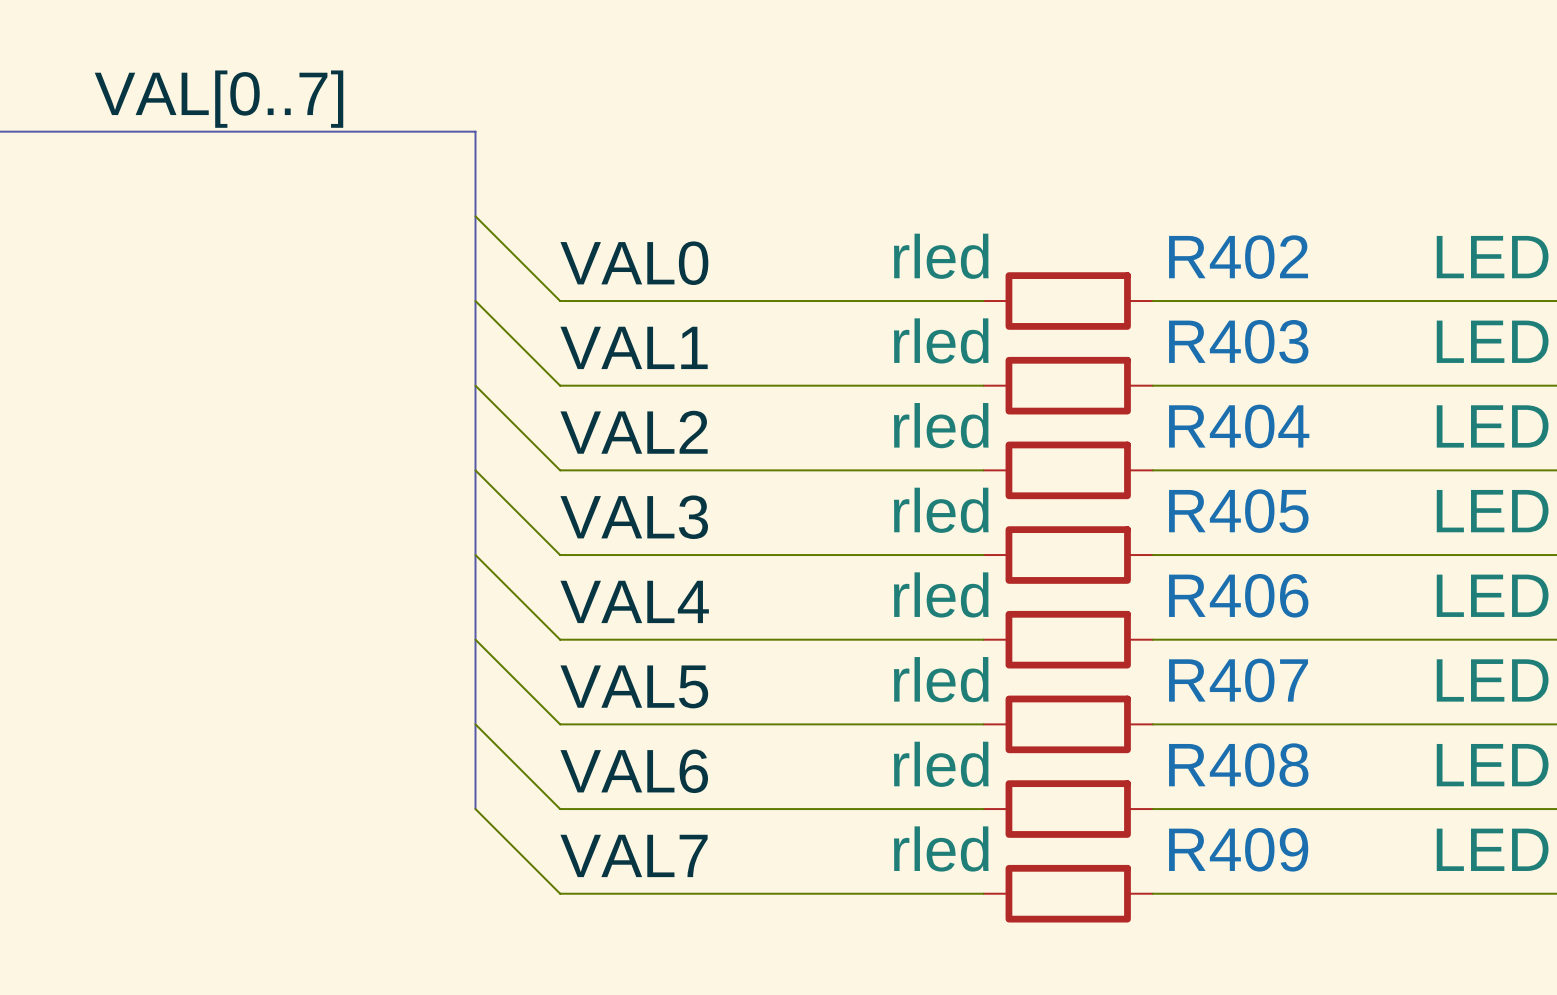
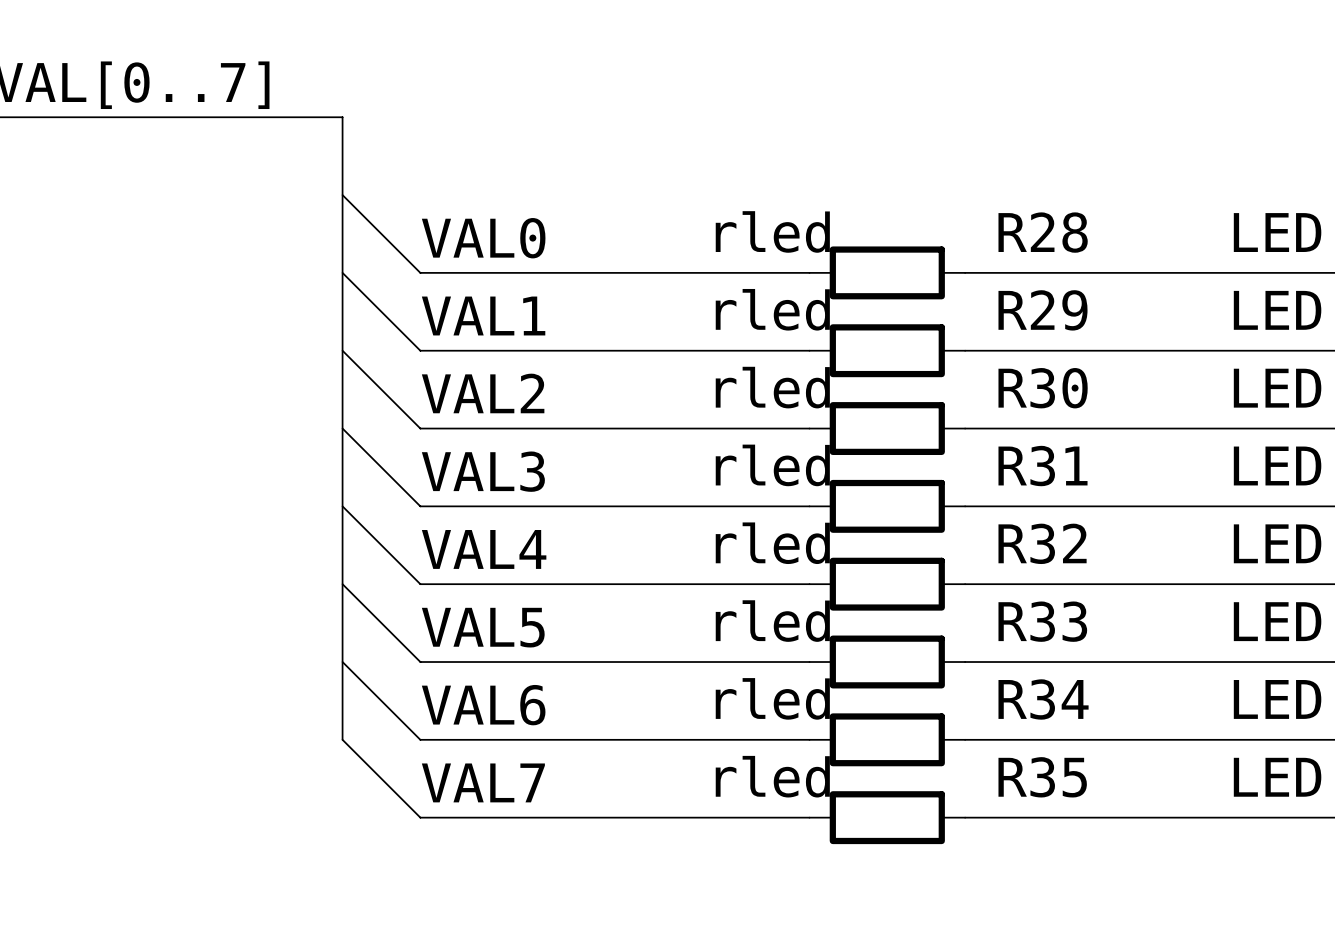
R402 name: R402 (1238, 257) -> R28 (1043, 232)
R403 name: R403 (1238, 341) -> R29 (1043, 310)
R404 name: R404 (1239, 426) -> R30 (1043, 388)
R405 name: R405 (1238, 511) -> R31 (1043, 466)
R406 name: R406 (1238, 595) -> R32 (1042, 543)
R407 name: R407 (1238, 680) -> R33 (1042, 621)
R408 name: R408 (1238, 765) -> R34 (1043, 699)
R409 name: R409 (1238, 849) -> R35 (1042, 777)

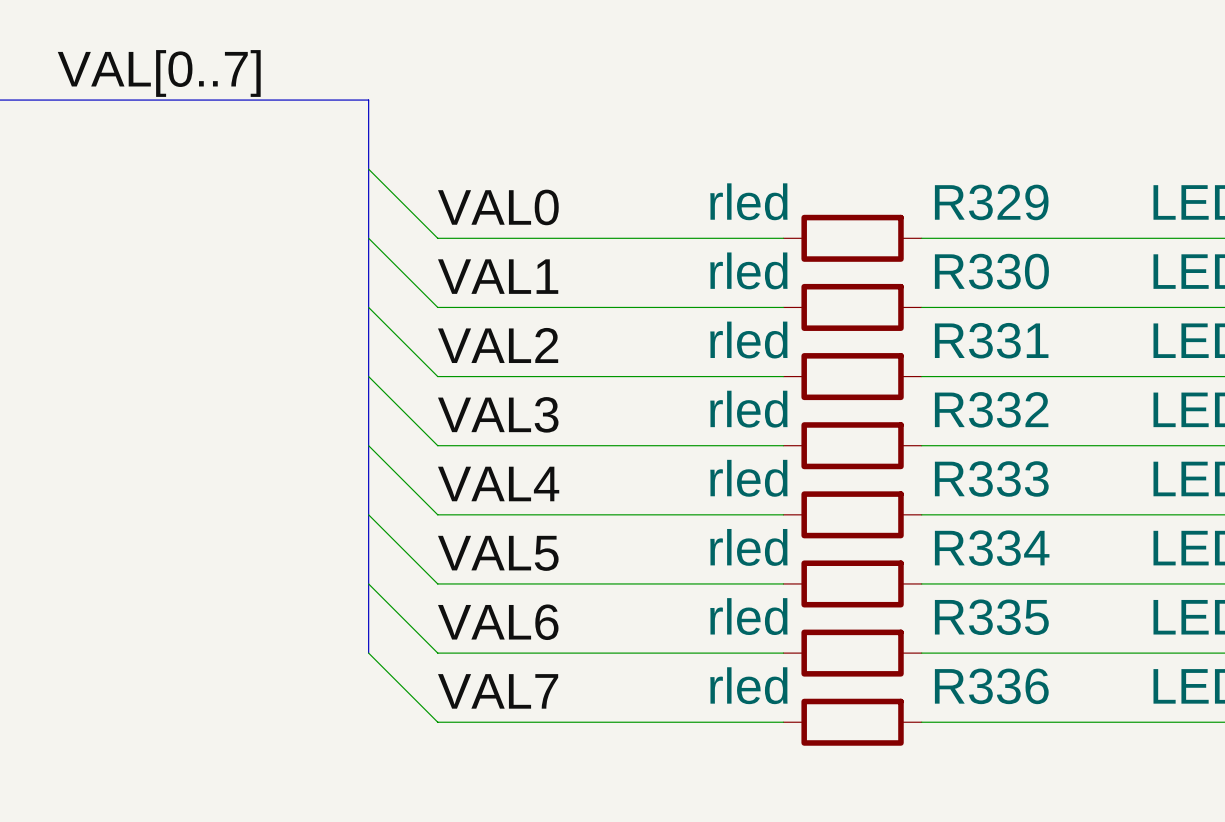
R28 name: R28 (1043, 232) -> R329 (991, 202)
R29 name: R29 (1043, 310) -> R330 (991, 271)
R30 name: R30 (1043, 388) -> R331 (991, 340)
R31 name: R31 (1043, 466) -> R332 (991, 409)
R32 name: R32 (1042, 543) -> R333 (991, 478)
R33 name: R33 (1042, 621) -> R334 (992, 548)
R34 name: R34 (1043, 699) -> R335 (991, 617)
R35 name: R35 (1042, 777) -> R336 (991, 686)

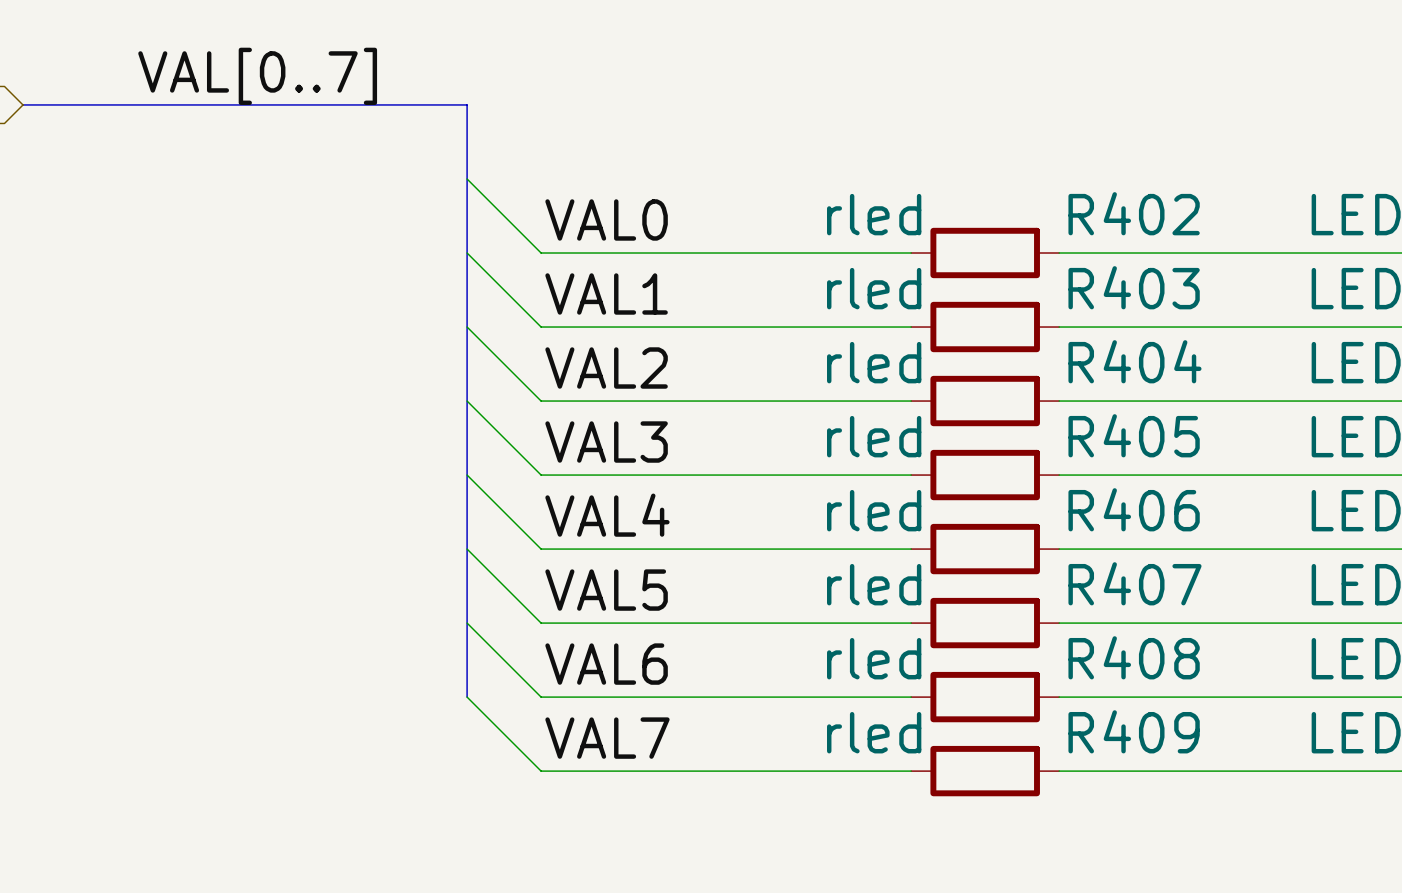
R329 name: R329 (991, 202) -> R402 (1134, 213)
R330 name: R330 (991, 271) -> R403 (1134, 287)
R331 name: R331 (991, 340) -> R404 (1134, 361)
R332 name: R332 (991, 409) -> R405 (1134, 435)
R333 name: R333 (991, 478) -> R406 (1134, 509)
R334 name: R334 (992, 548) -> R407 (1134, 583)
R335 name: R335 (991, 617) -> R408 (1134, 657)
R336 name: R336 (991, 686) -> R409 (1134, 731)

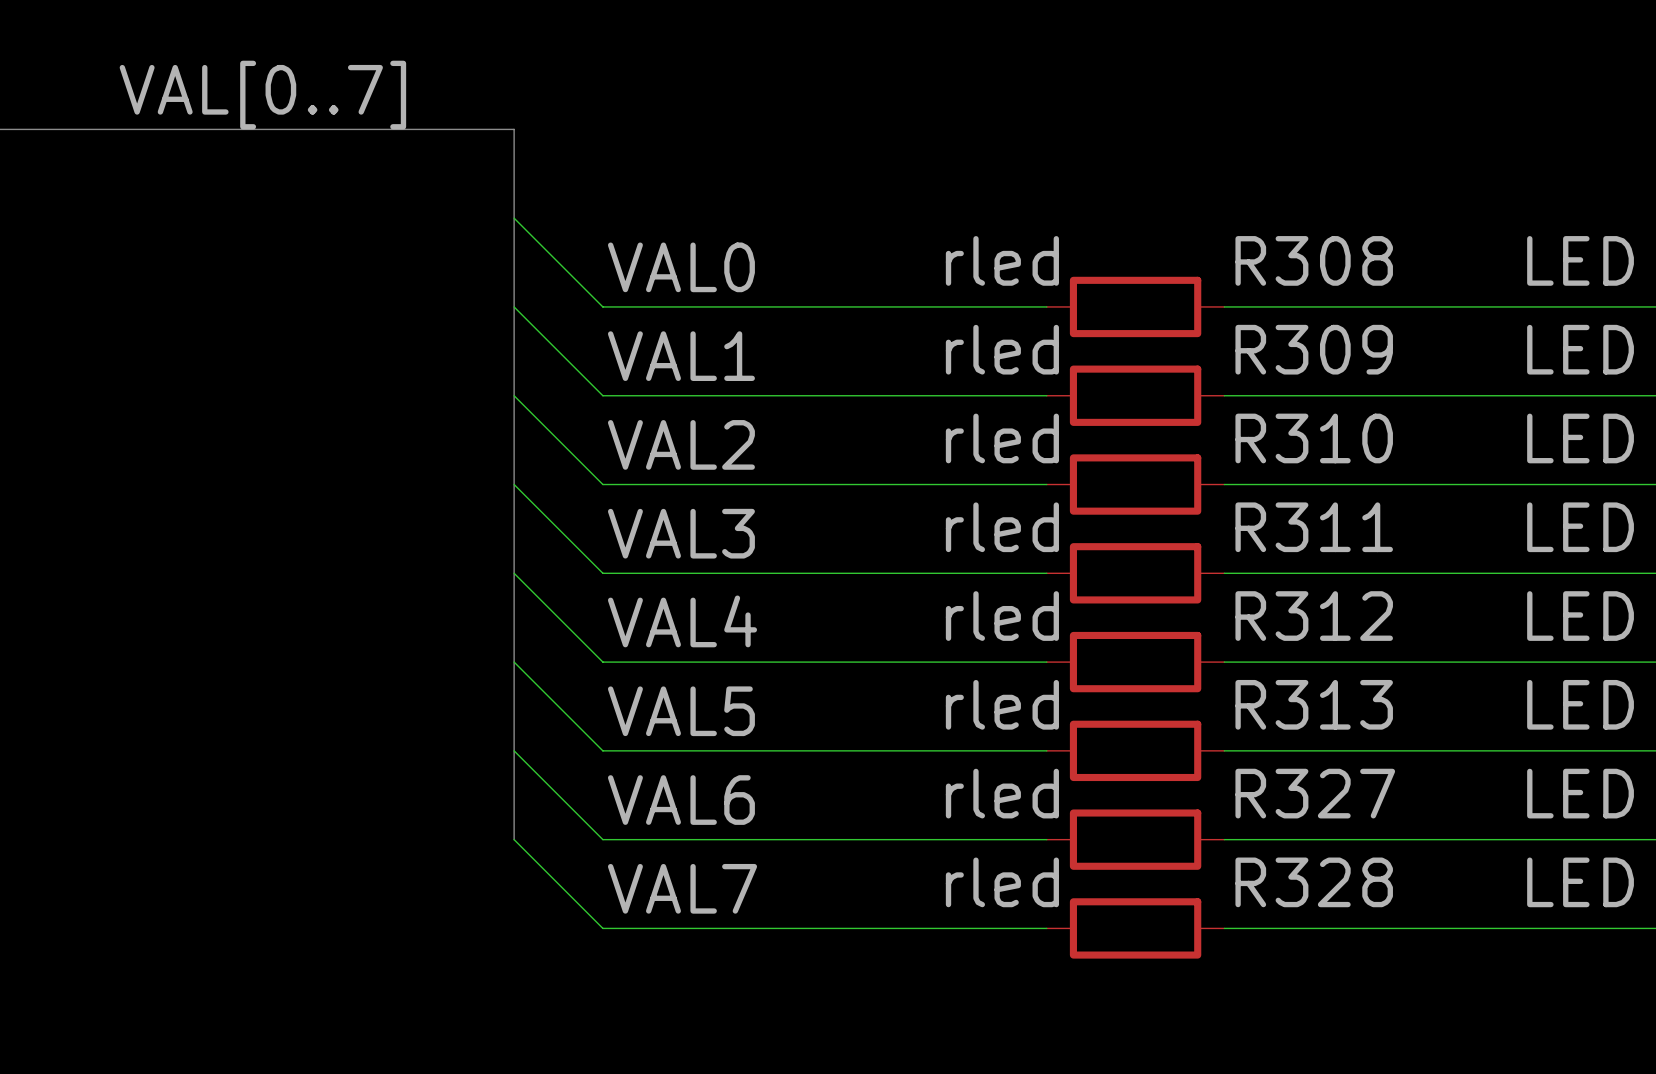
R402 name: R402 (1134, 213) -> R308 (1314, 260)
R403 name: R403 (1134, 287) -> R309 (1314, 349)
R404 name: R404 (1134, 361) -> R310 (1314, 438)
R405 name: R405 (1134, 435) -> R311 (1314, 527)
R406 name: R406 (1134, 509) -> R312 (1314, 616)
R407 name: R407 (1134, 583) -> R313 (1314, 704)
R408 name: R408 (1134, 657) -> R327 (1315, 793)
R409 name: R409 (1134, 731) -> R328 (1314, 882)

